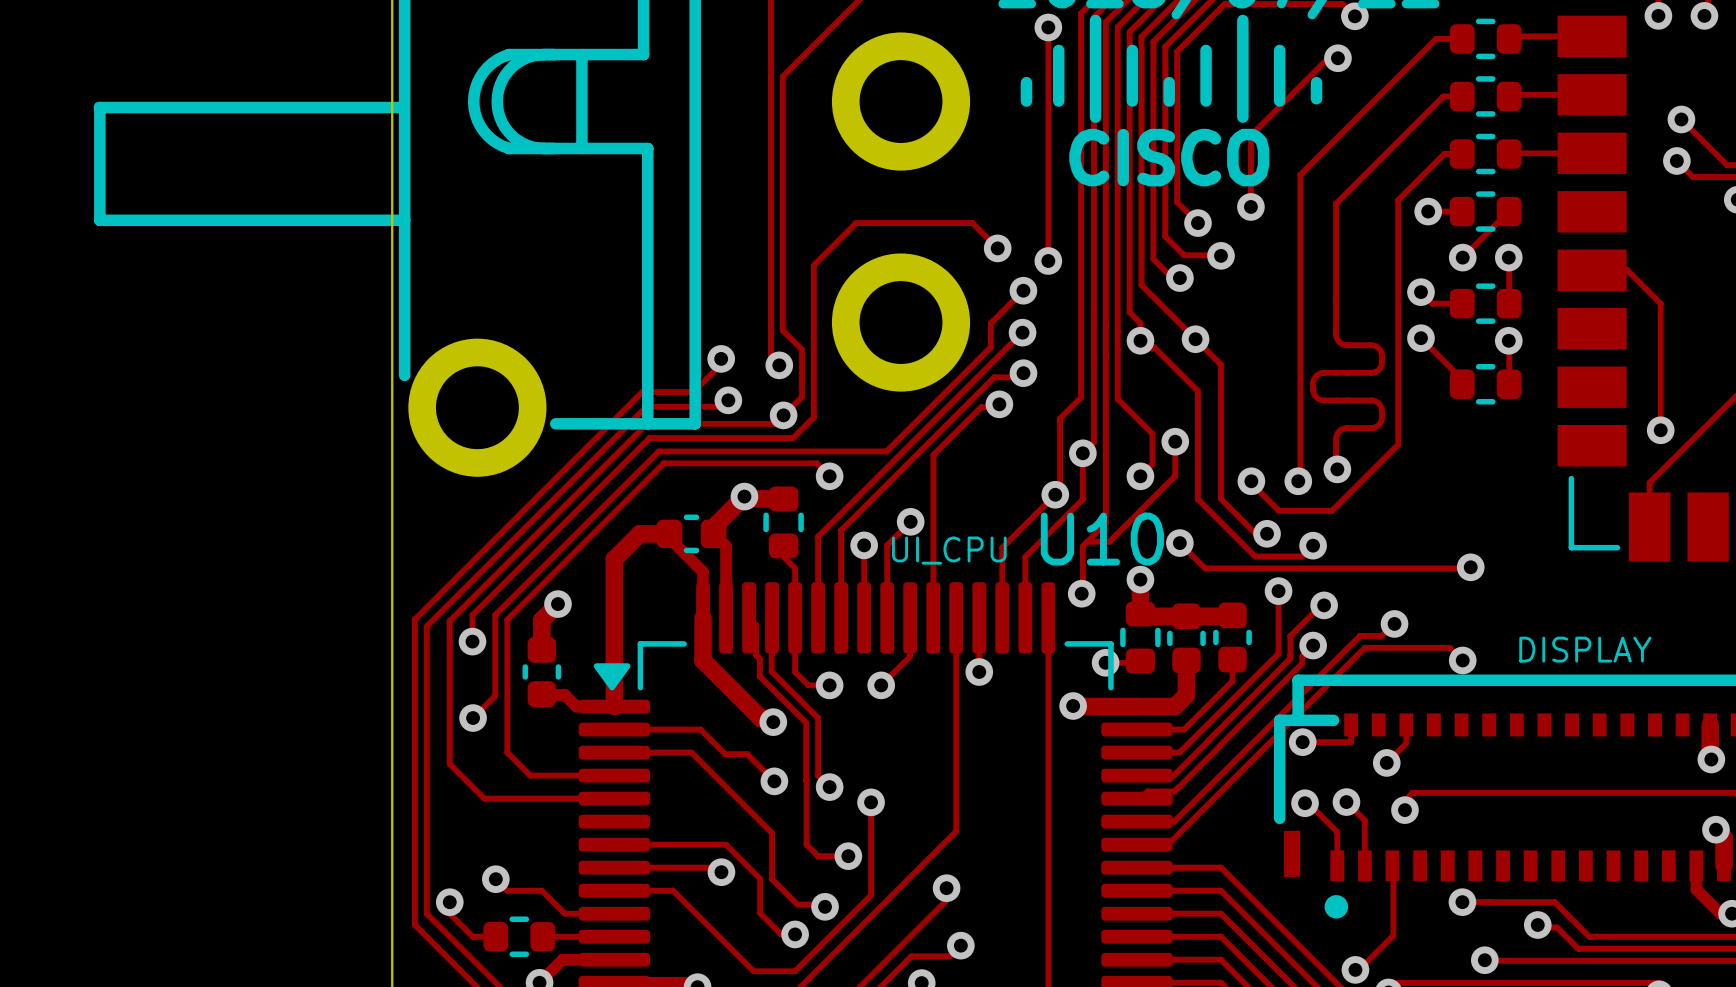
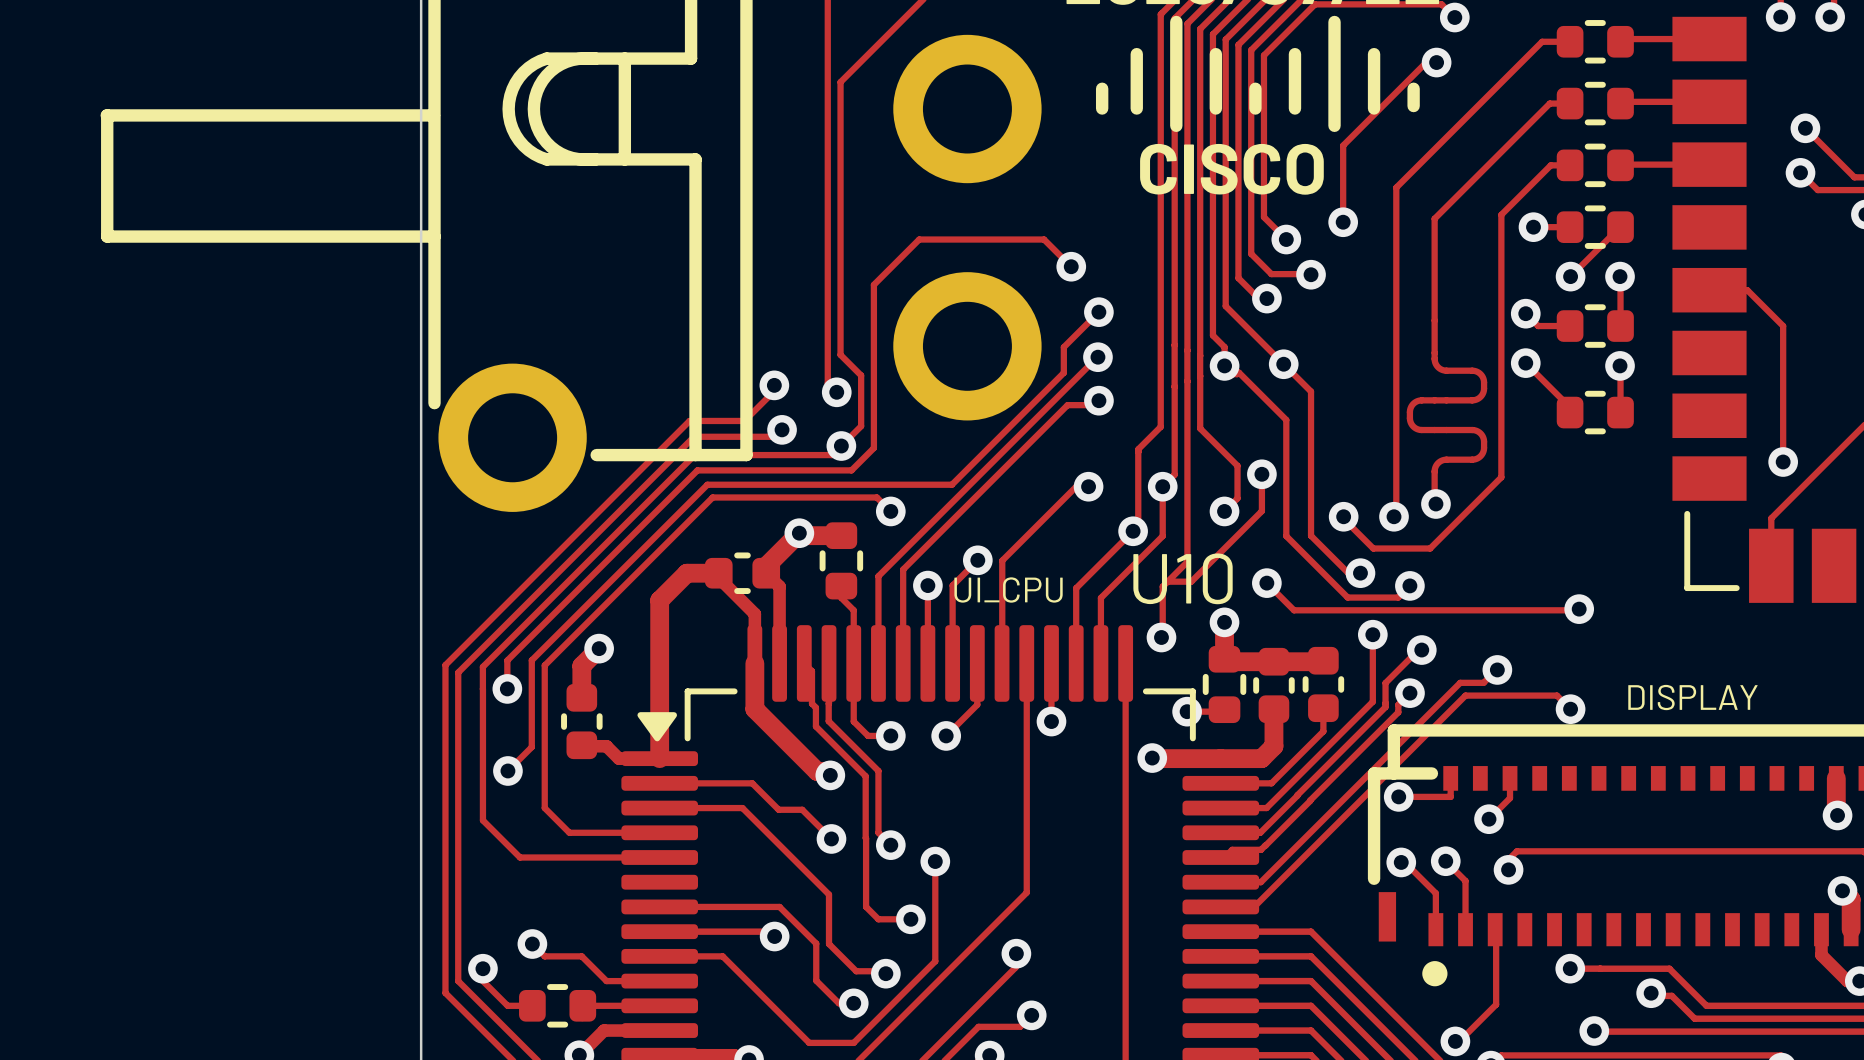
track: (1048, 27) (1048, 260) -> none
via: (1048, 27) -> none
via: (1048, 260) -> none
track: (999, 404) (1002, 407) (981, 407) (933, 454) (933, 522) -> (1088, 486) (1076, 486) (1002, 560)
via position: (999, 404) -> (1088, 486)

